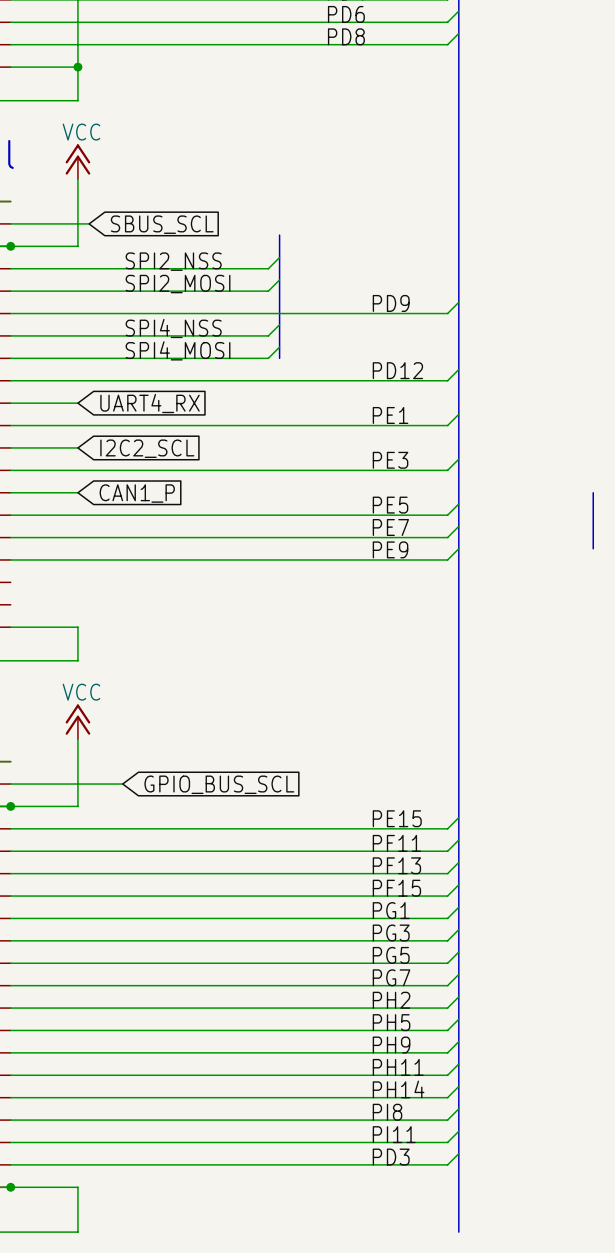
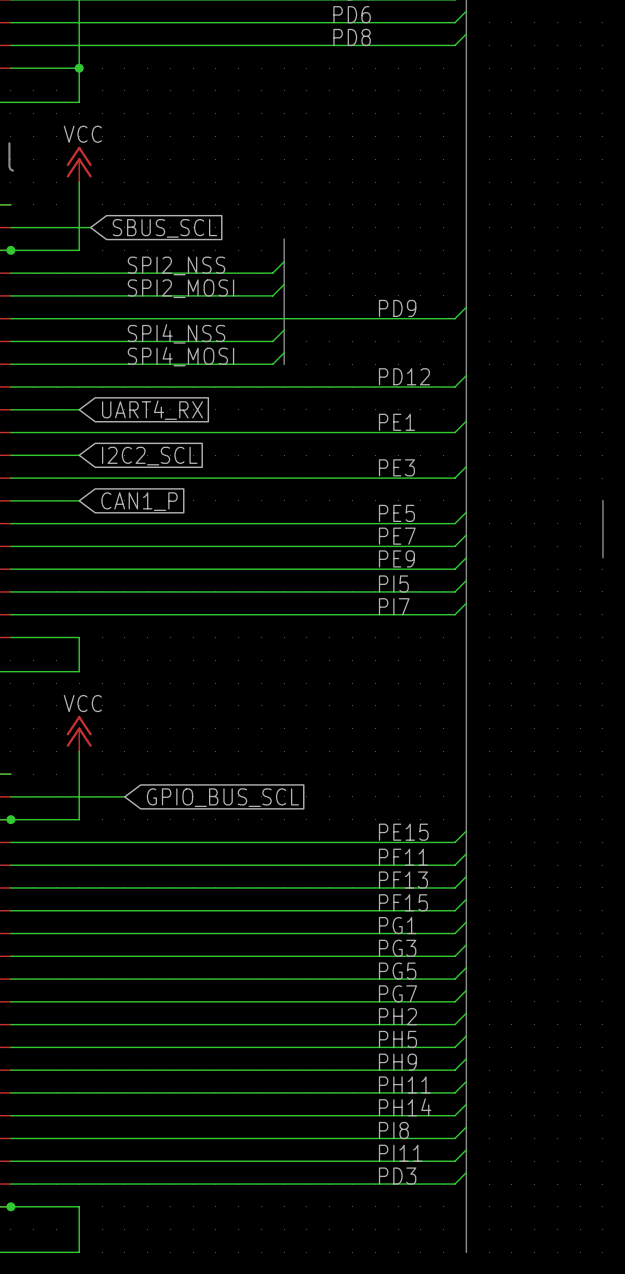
wire: none -> (466, 580) (454, 591) (10, 591)
label: none -> PI5 (393, 583)
wire: none -> (466, 603) (454, 614) (10, 614)
label: none -> PI7 (394, 606)

